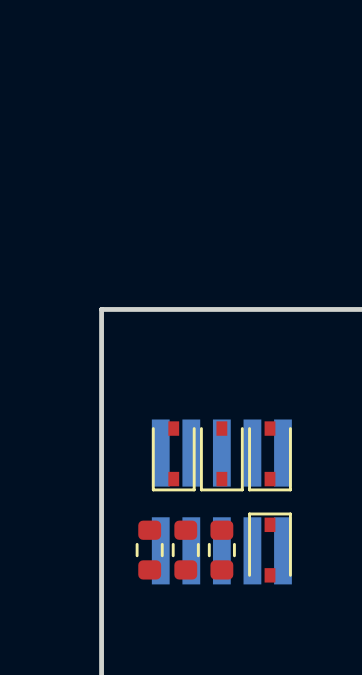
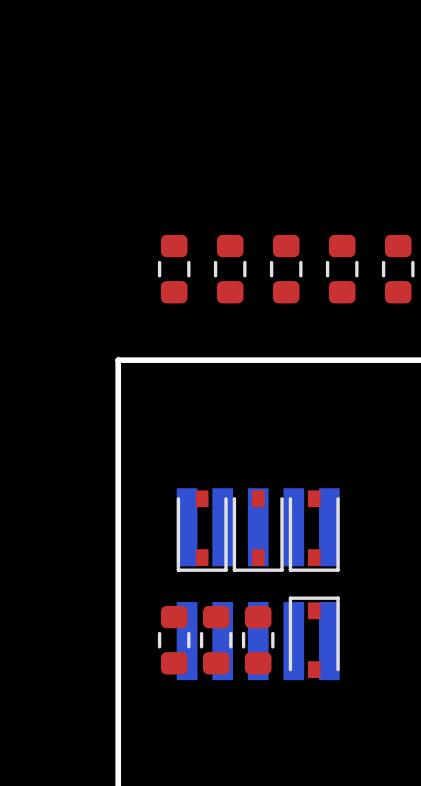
part: none -> (174, 269)
part: none -> (230, 269)
part: none -> (286, 269)
part: none -> (342, 269)
part: none -> (398, 269)

